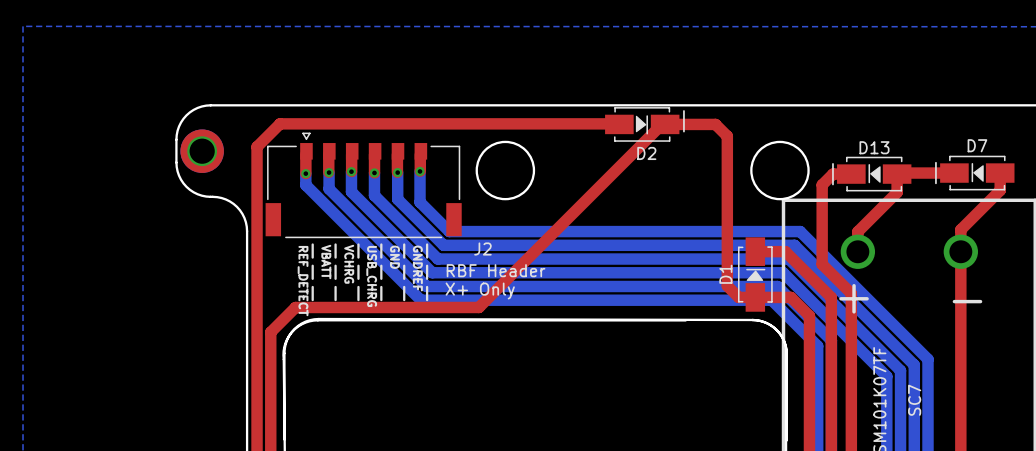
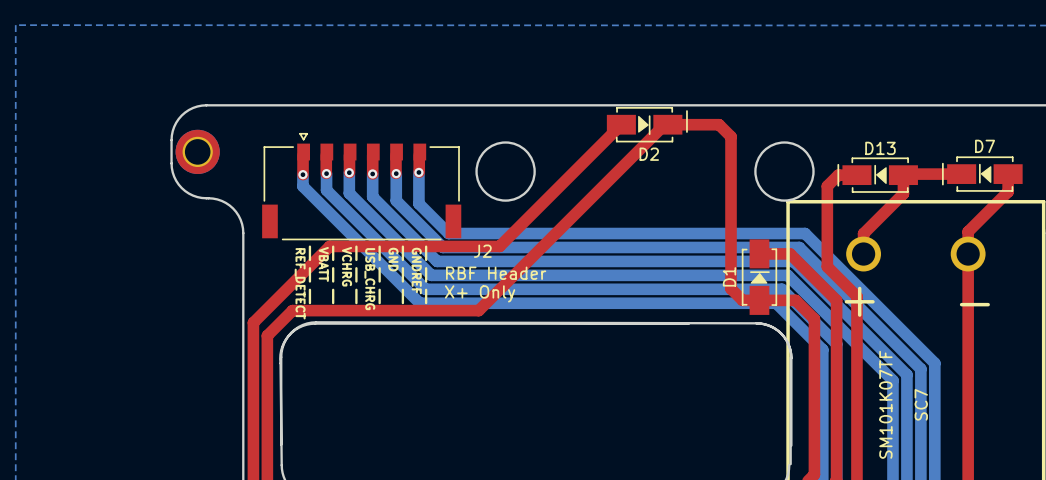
top track: (616, 123) (280, 123) (257, 146) (257, 319) -> (621, 124) (499, 246) (329, 246) (253, 322)

